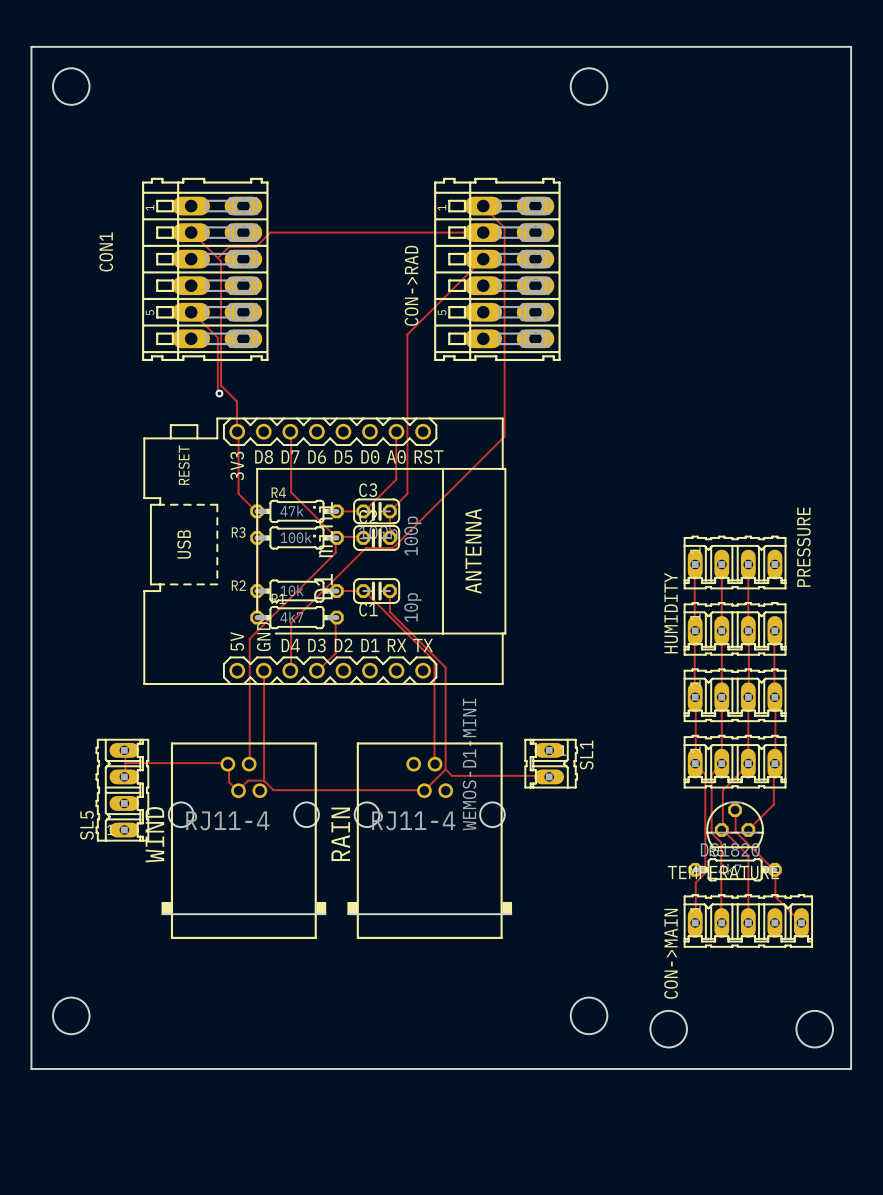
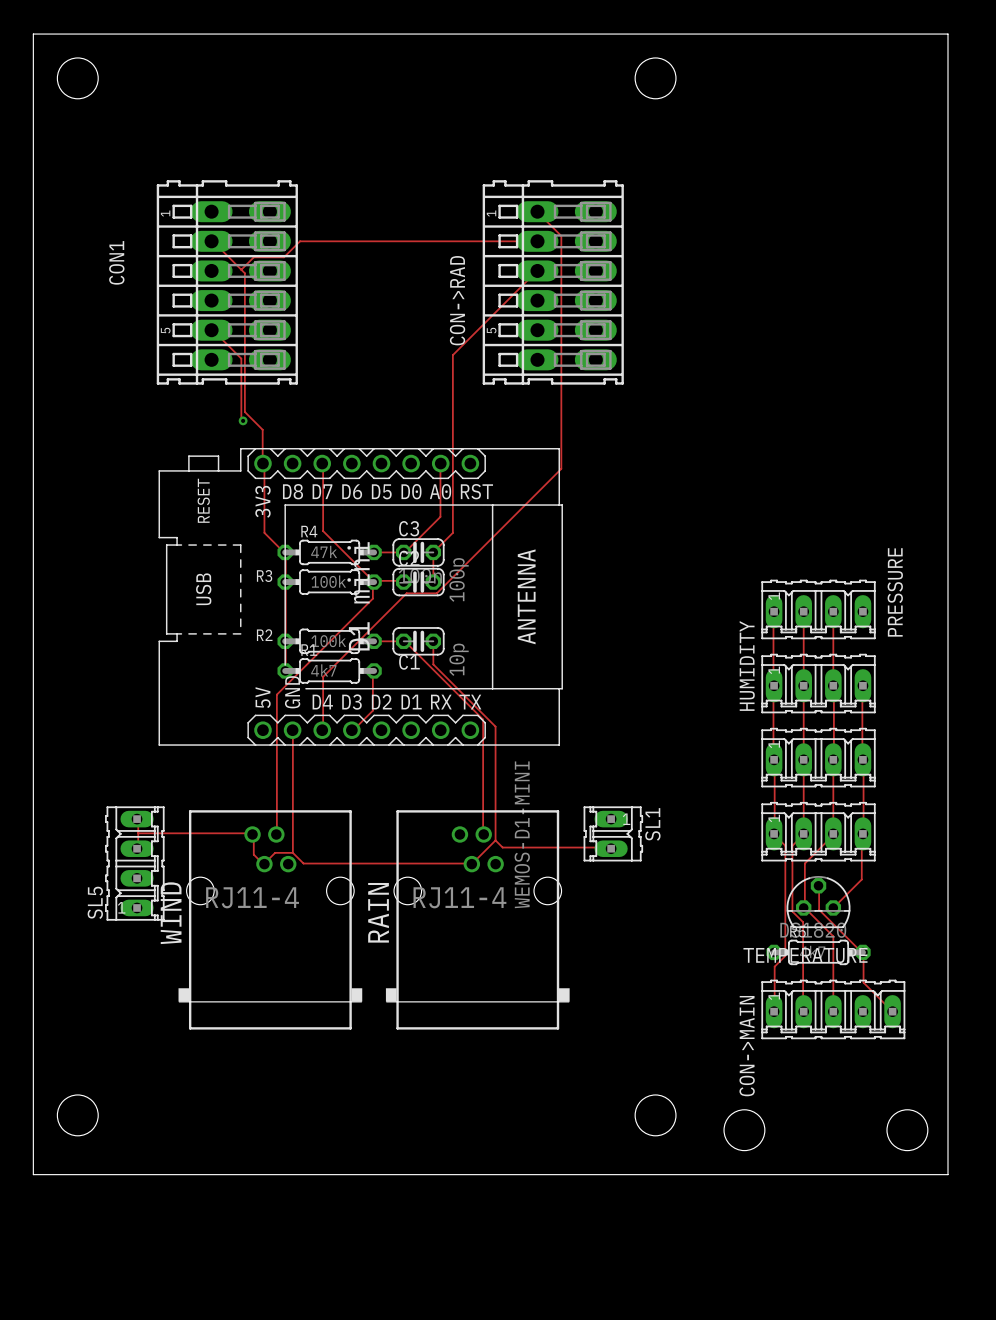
R2 value: 10k (292, 590) -> 100k (328, 640)

